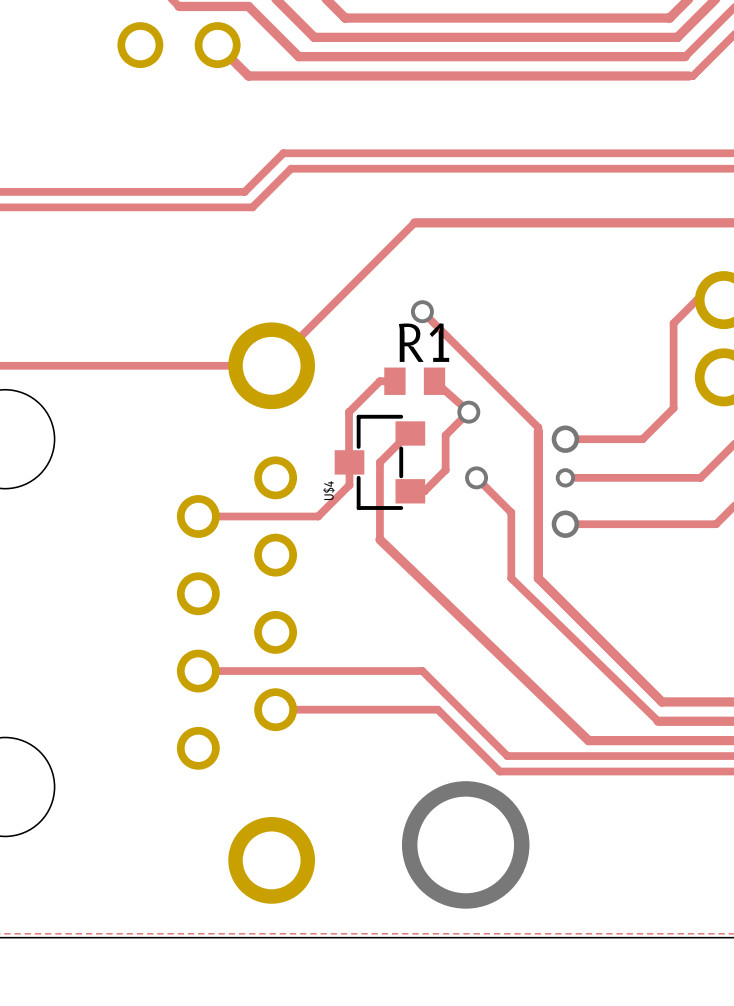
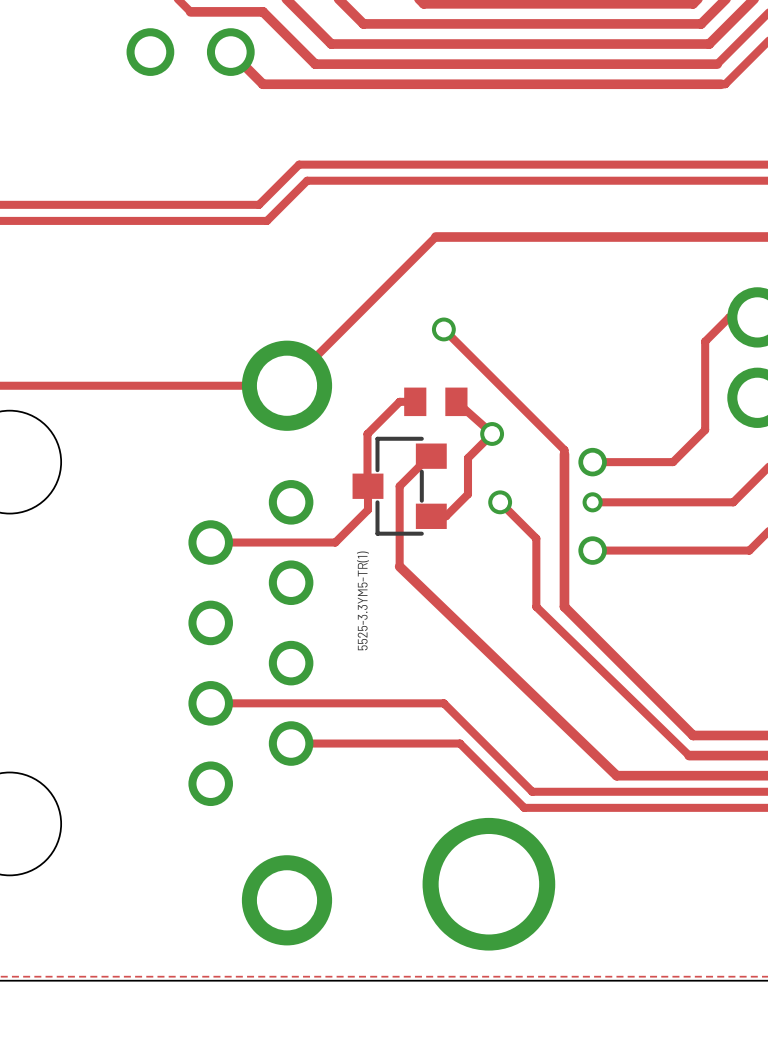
R1 name: R1 (424, 342) -> none
U$4 name: U$4 (328, 490) -> 5525-3.3YM5-TR(1) (362, 600)

